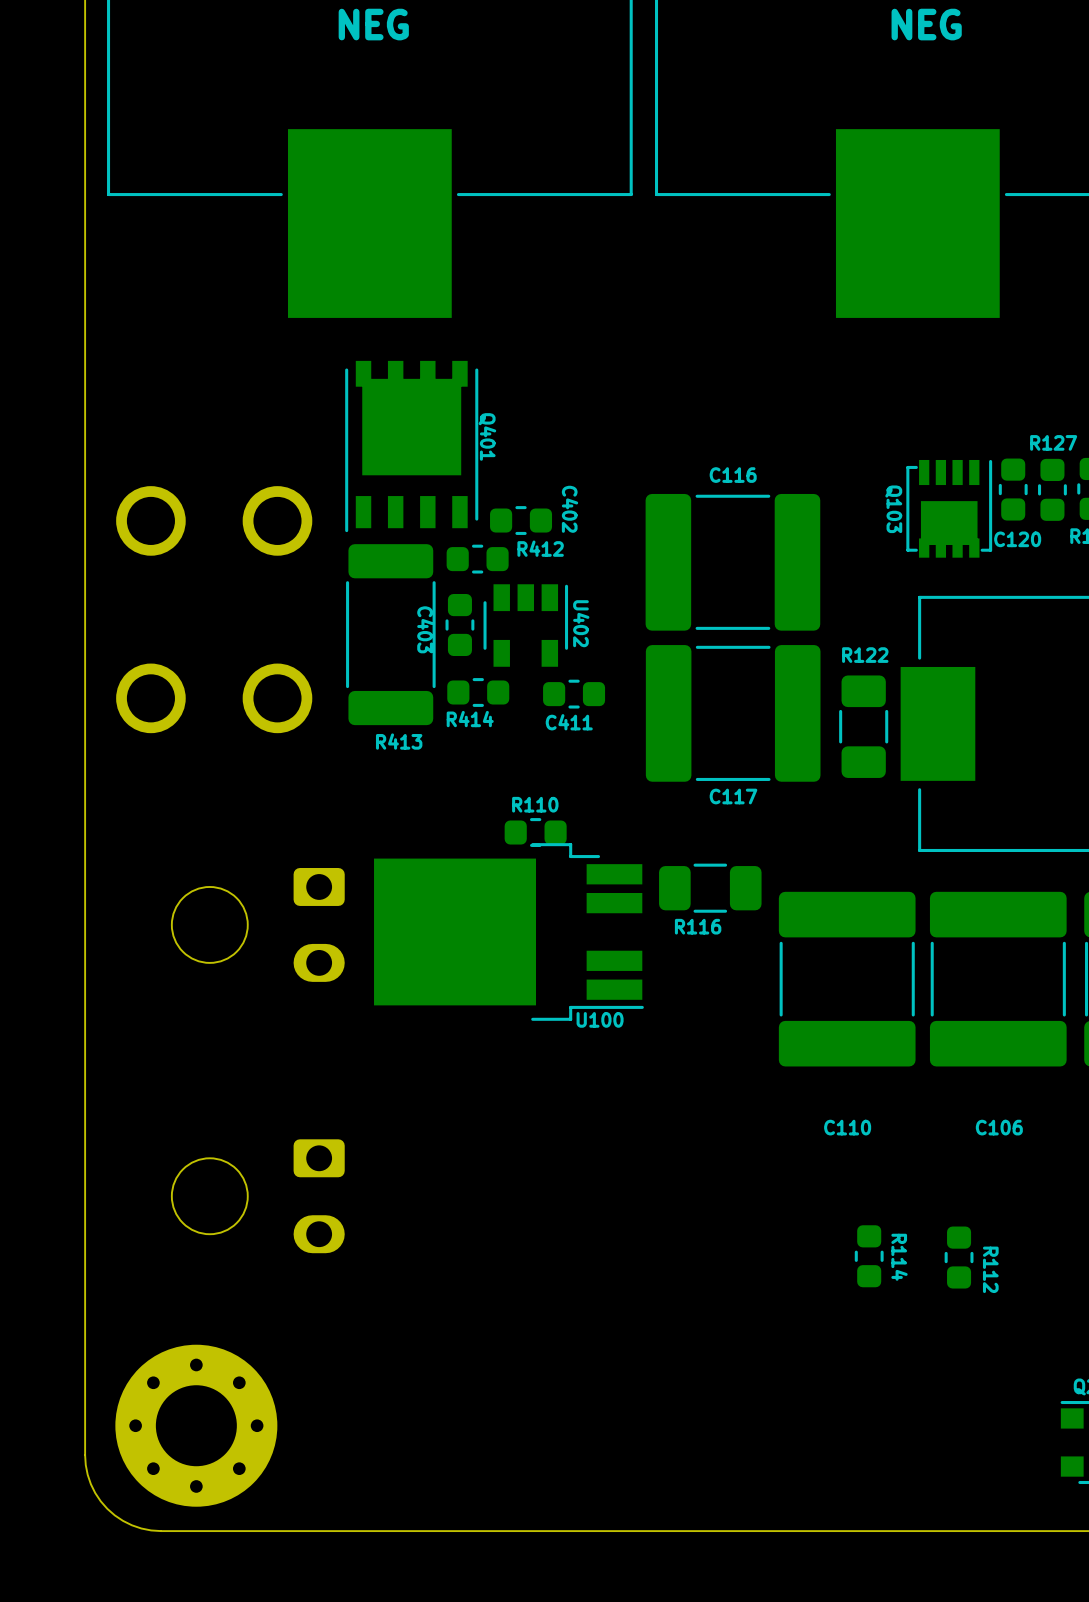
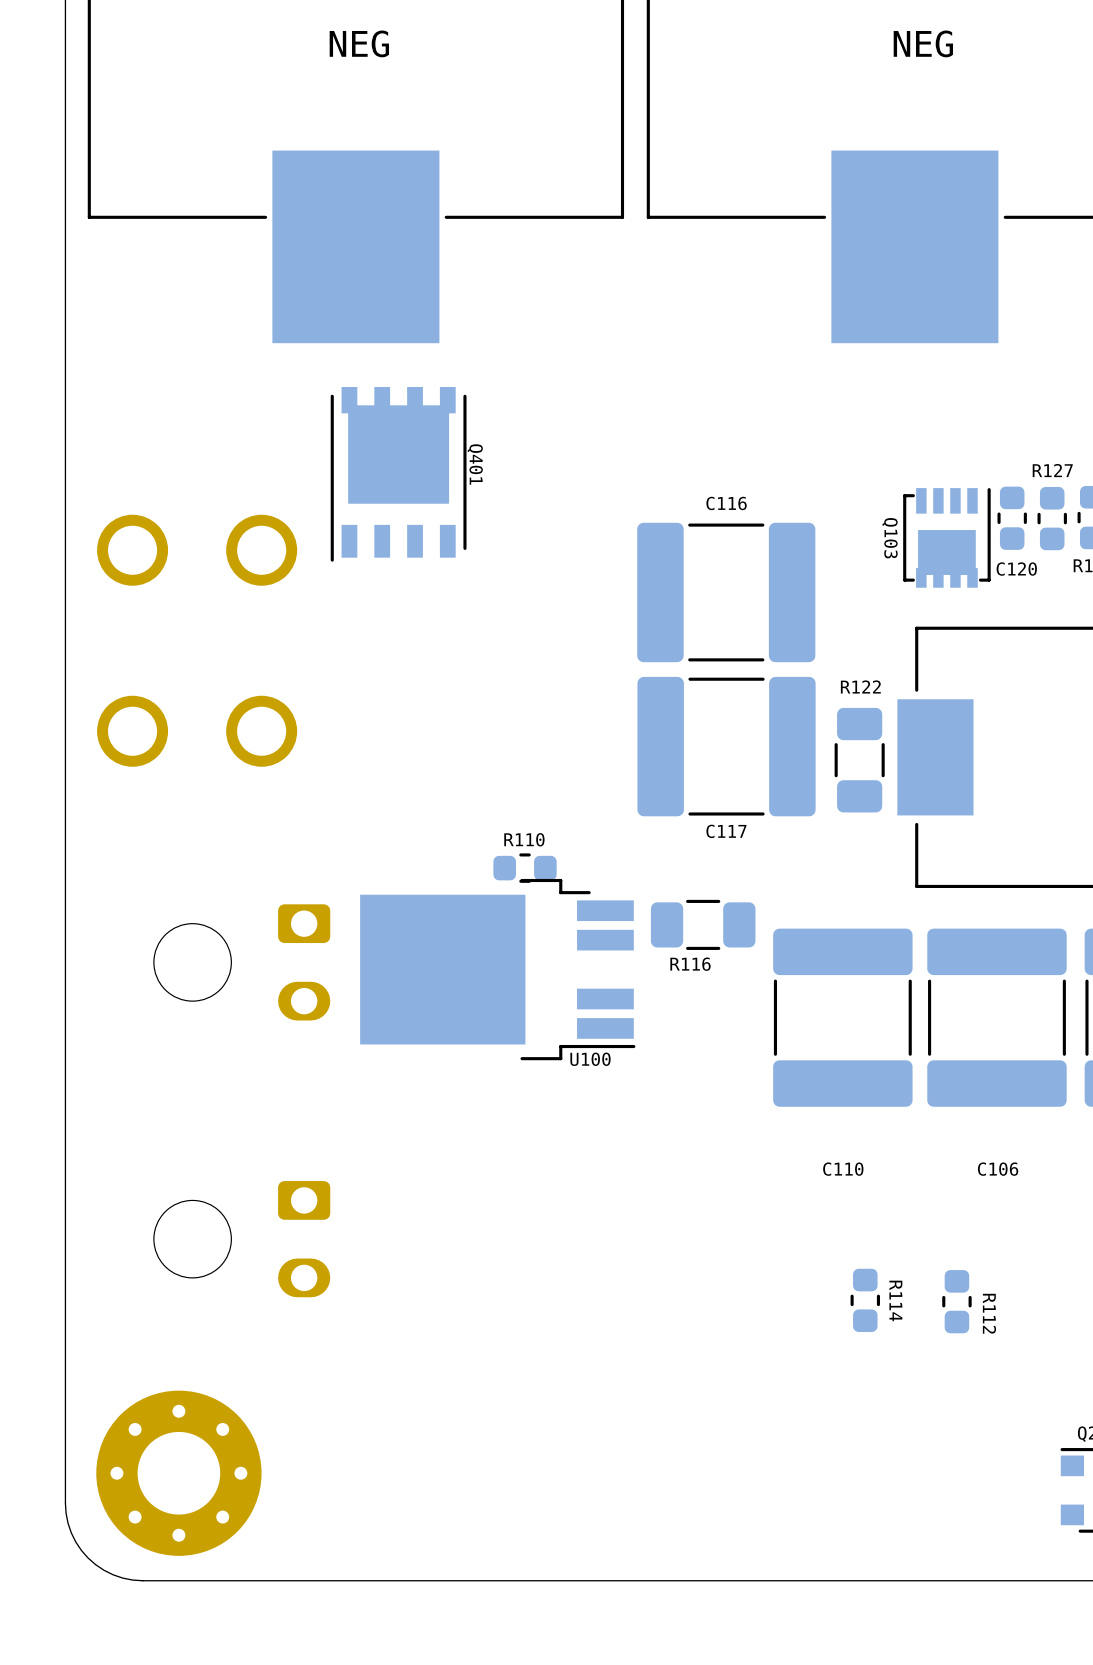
C402: (521, 520) -> none
R412: (477, 559) -> none
C403: (459, 625) -> none
U402: (525, 625) -> none
R413: (390, 634) -> none
R414: (478, 692) -> none
C411: (574, 694) -> none

